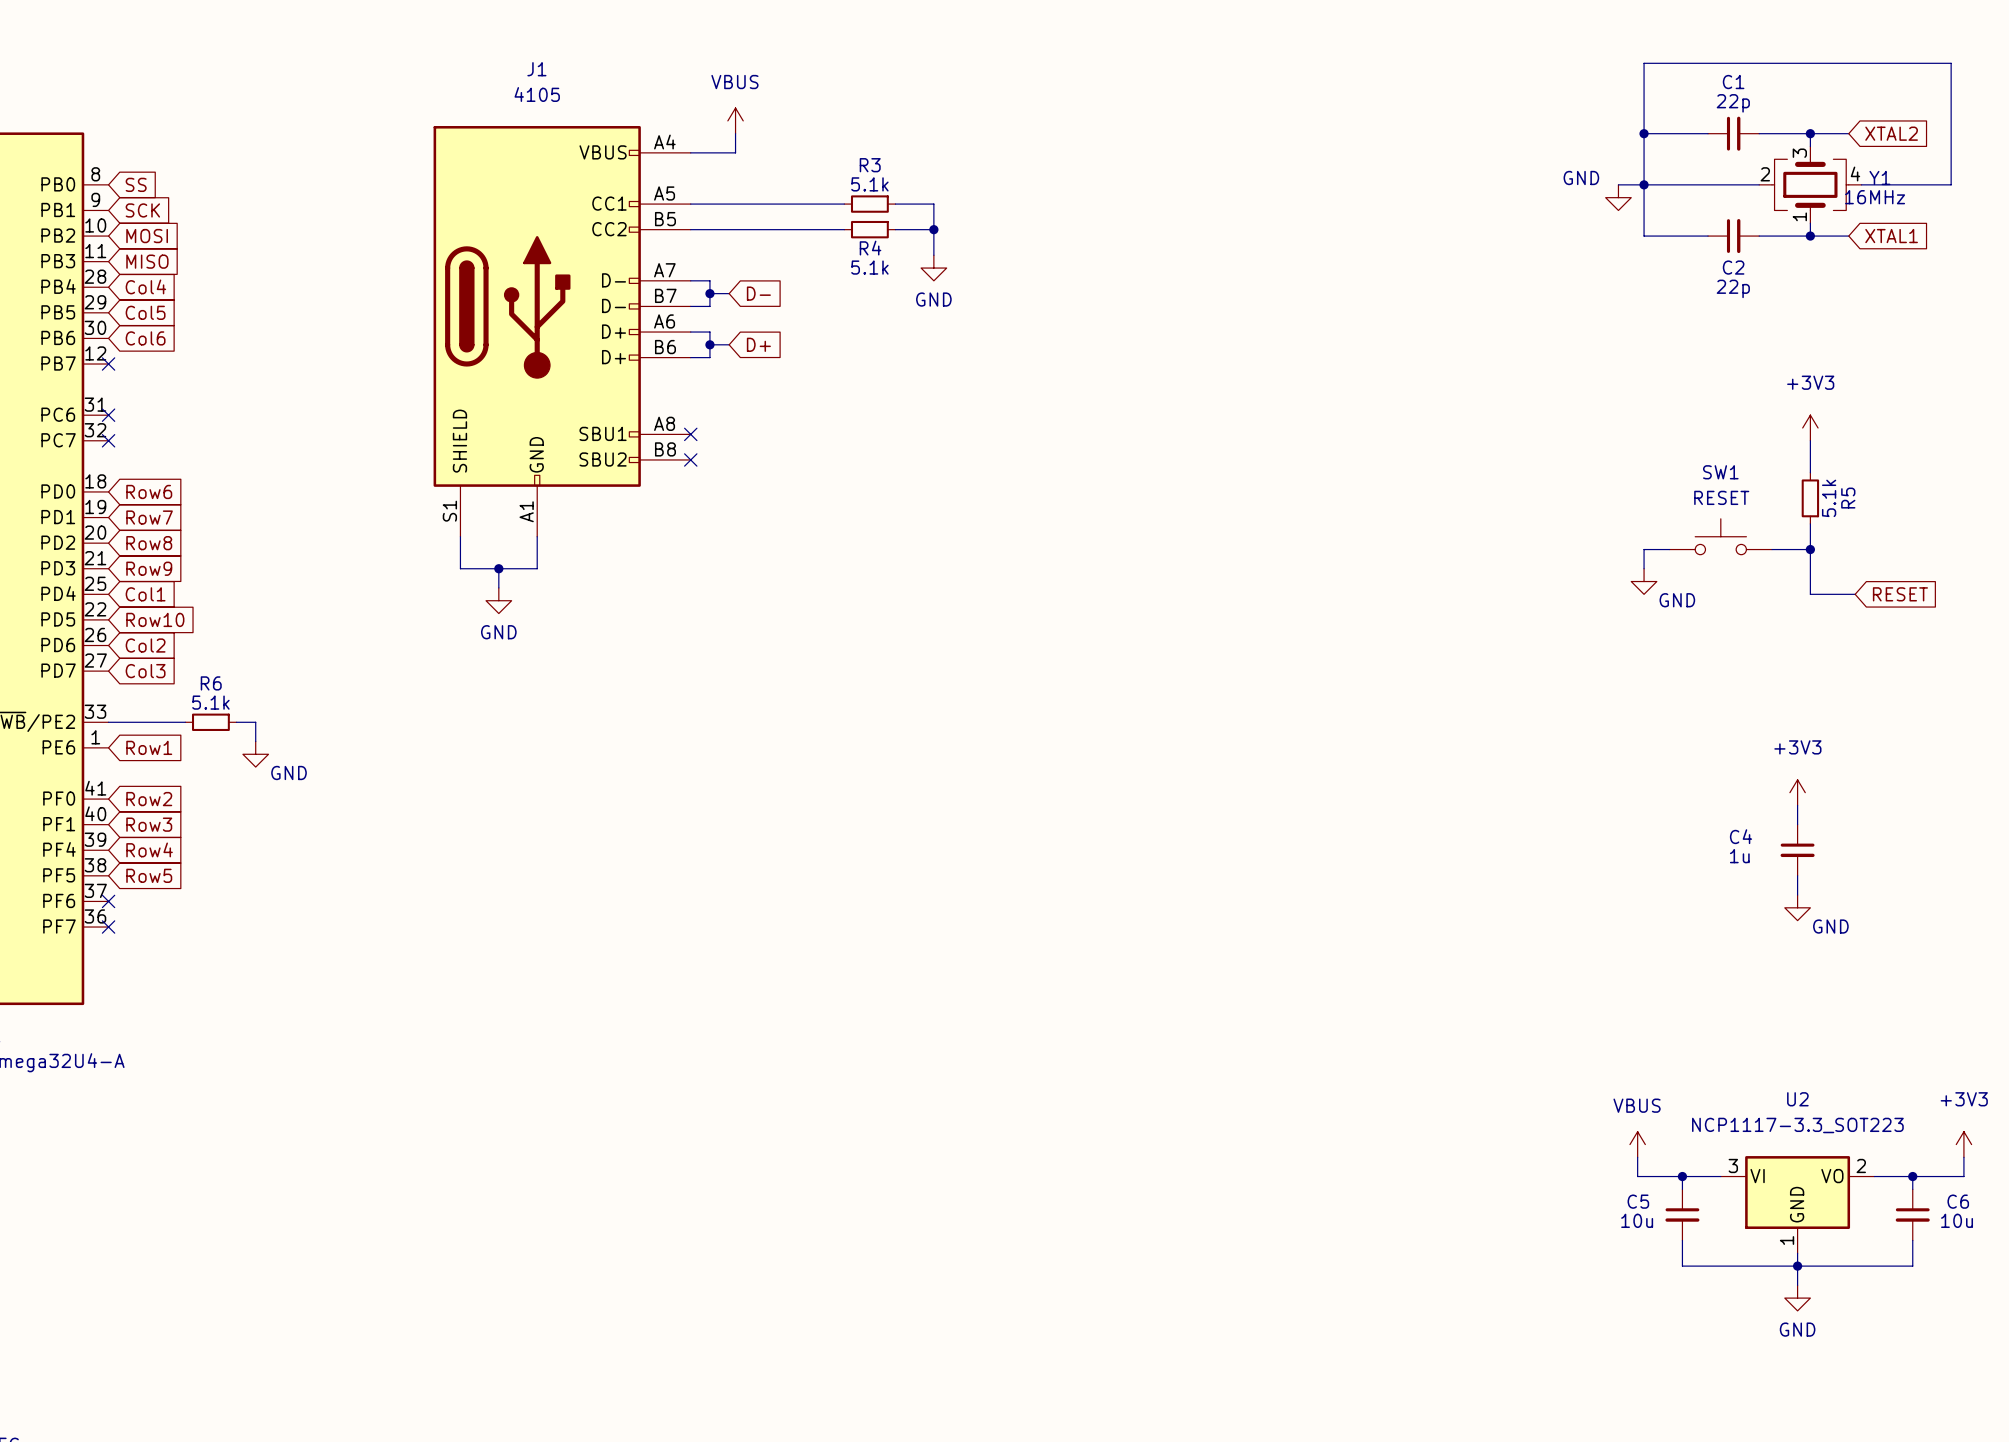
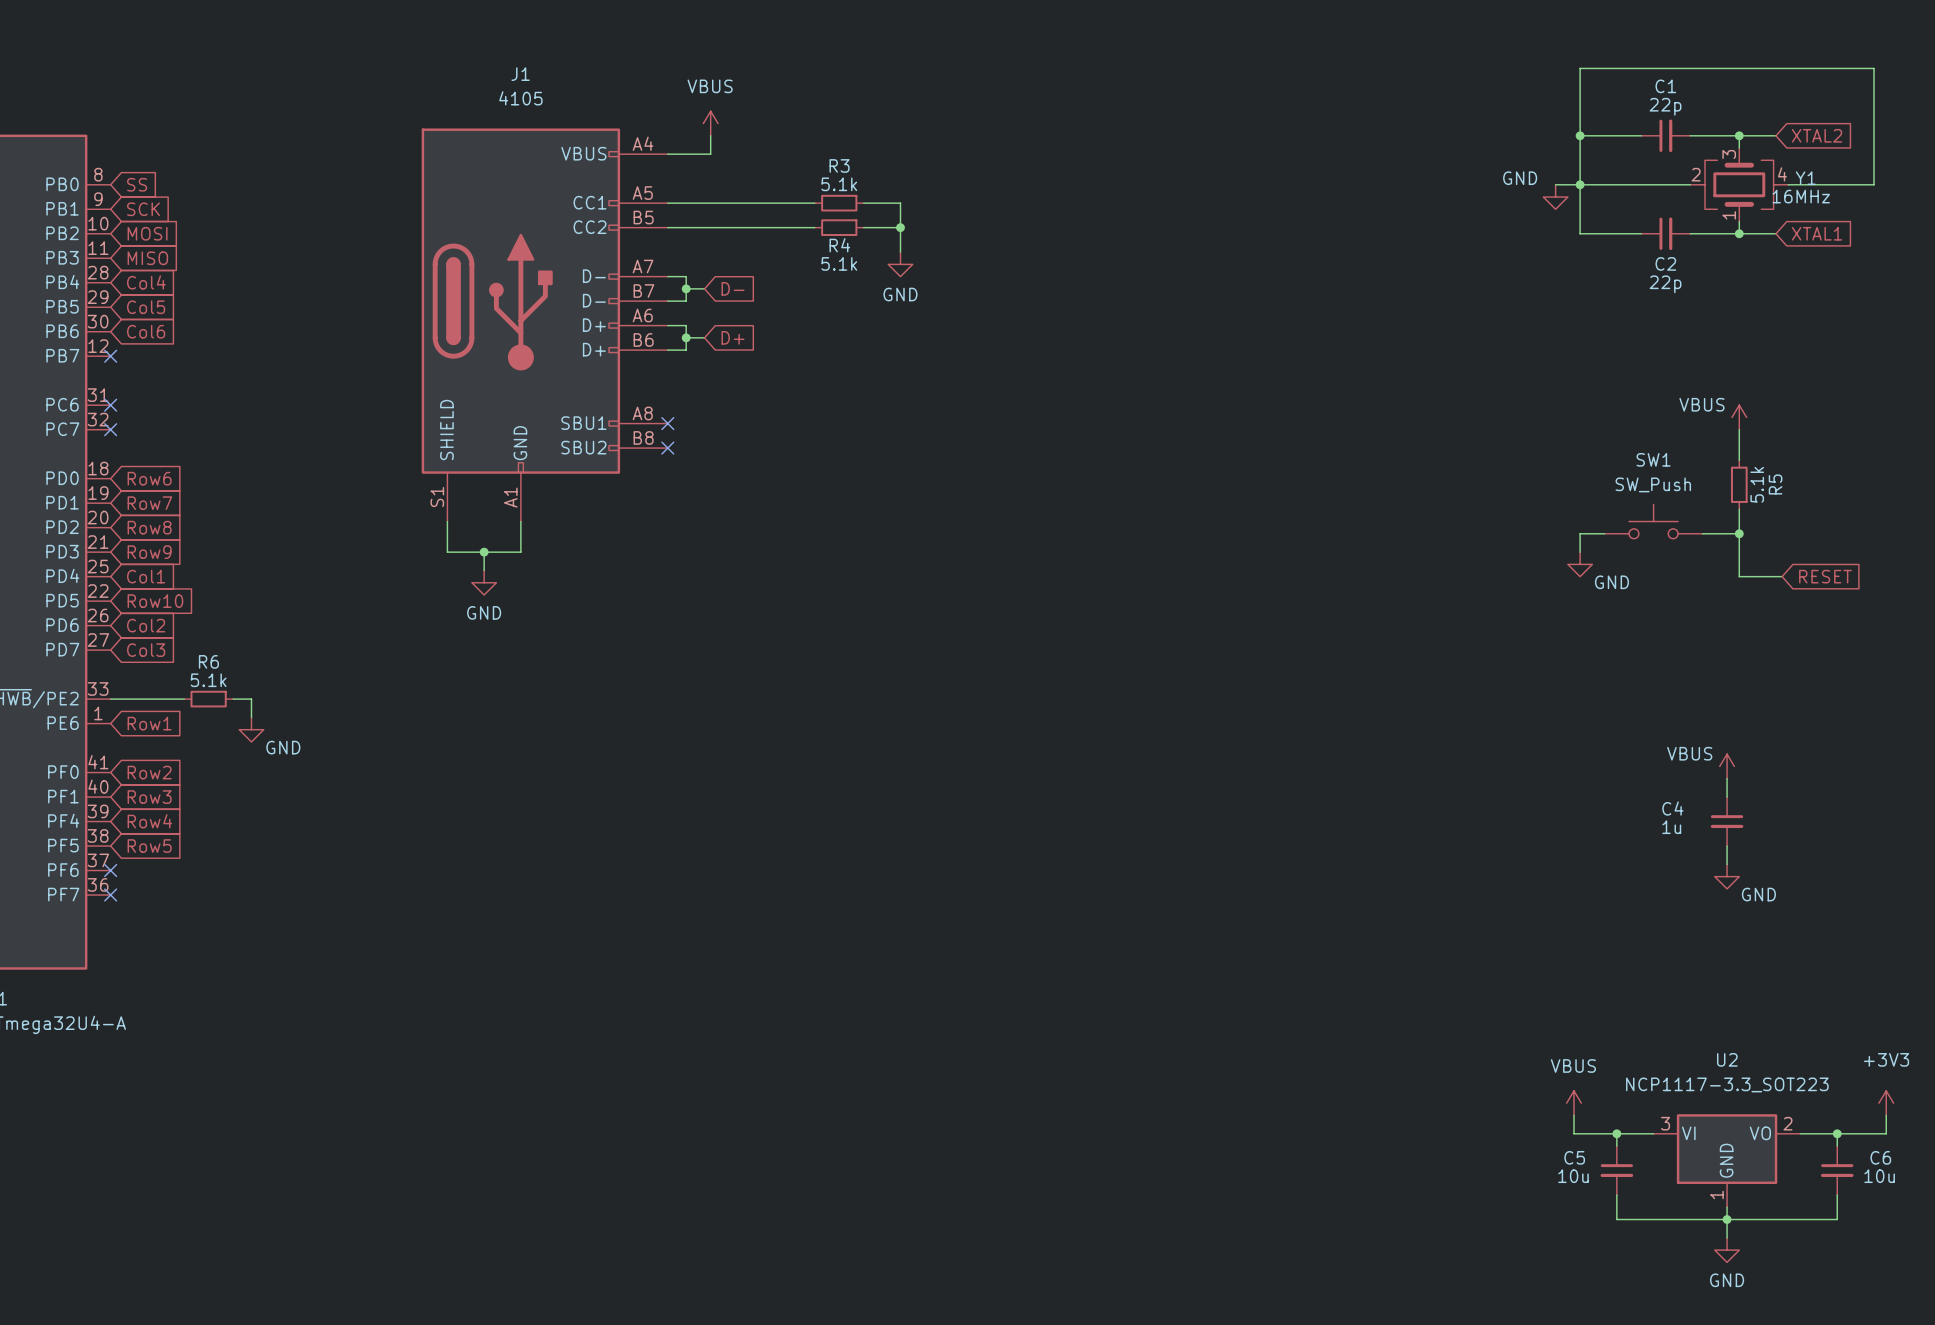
power symbol: +3V3 (1810, 427) -> VBUS (1739, 417)
SW1 value: RESET (1721, 497) -> SW_Push (1653, 484)
power symbol: +3V3 (1797, 792) -> VBUS (1727, 766)

